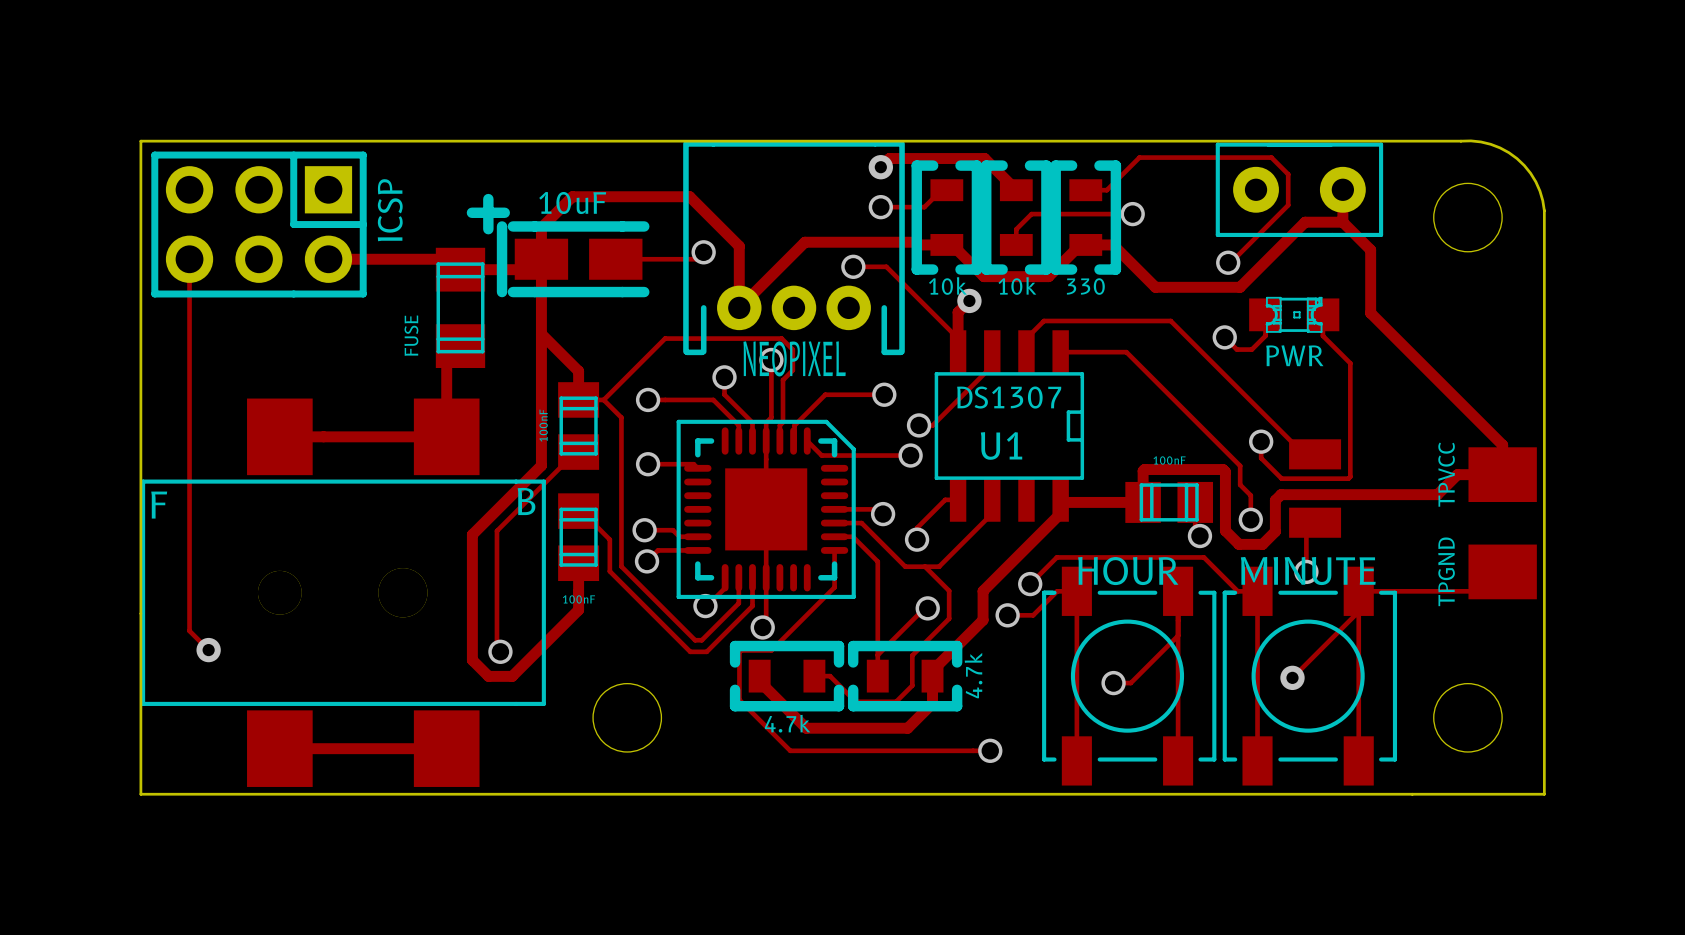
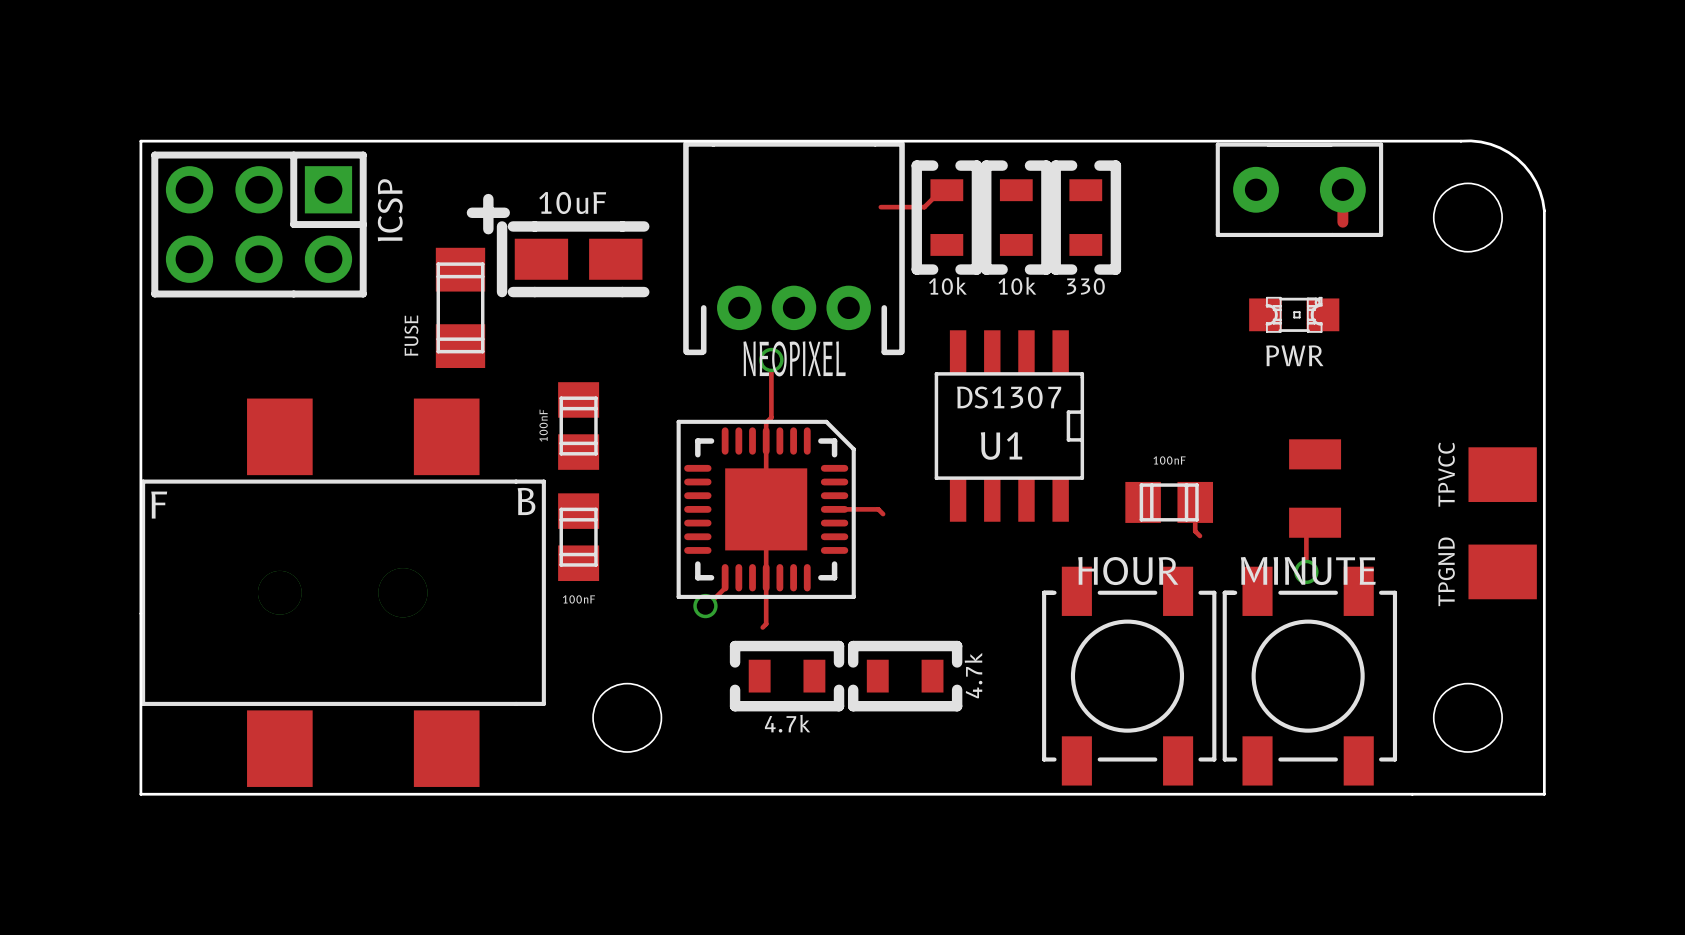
track: (880, 167) (889, 158) (984, 158) (1016, 190) -> none
via: (880, 167) -> none
track: (1085, 190) (1106, 190) (1139, 157) (1271, 157) (1288, 174) (1288, 205) (1230, 262) (1228, 262) -> none
via: (880, 207) -> none
track: (1132, 214) (1031, 214) (1016, 229) (1016, 244) -> none
via: (1132, 214) -> none
track: (703, 252) (696, 259) (615, 259) -> none
via: (703, 252) -> none
track: (189, 259) (189, 630) (208, 650) -> none
track: (328, 259) (450, 259) (460, 269) (531, 269) (541, 259) -> none
via: (1228, 262) -> none
track: (853, 266) (886, 266) (958, 338) (958, 352) (958, 312) (969, 300) -> none
via: (853, 266) -> none
via: (969, 300) -> none
track: (1265, 314) (1265, 335) (1251, 349) (1236, 349) (1224, 337) -> none
track: (1322, 314) (1322, 335) (1350, 363) (1350, 476) (1348, 478) (1281, 478) (1261, 458) (1261, 441) -> none
track: (541, 334) (578, 371) (578, 399) (603, 399) -> none
via: (1224, 337) -> none
track: (460, 346) (446, 359) (446, 436) (279, 436) -> none
track: (992, 352) (992, 365) (932, 425) (919, 425) -> none
track: (1026, 352) (1026, 338) (1043, 320) (1170, 320) (1304, 454) (1315, 454) -> none
track: (1060, 352) (1126, 352) (1240, 465) (1240, 484) (1250, 495) (1250, 519) -> none
track: (724, 377) (724, 394) (752, 422) (752, 441) -> none
via: (724, 377) -> none
track: (884, 394) (825, 394) (794, 425) (793, 441) -> none
via: (884, 394) -> none
track: (603, 399) (621, 417) (621, 566) (695, 640) (701, 640) (738, 603) (738, 577) -> none
track: (603, 399) (665, 338) (781, 338) (792, 349) (792, 370) (783, 380) (783, 422) (779, 425) (779, 441) -> none
track: (648, 399) (713, 399) (738, 425) (738, 441) -> none
via: (648, 399) -> none
via: (919, 425) -> none
track: (807, 441) (821, 455) (910, 455) -> none
via: (1261, 441) -> none
track: (578, 452) (575, 452) (496, 530) (496, 648) (500, 651) -> none
via: (910, 455) -> none
track: (648, 464) (693, 464) (697, 468) -> none
via: (648, 464) -> none
track: (958, 499) (945, 499) (917, 528) (917, 539) -> none
track: (992, 499) (992, 513) (939, 566) (905, 566) (861, 523) (834, 523) -> none
track: (578, 511) (581, 511) (609, 539) (609, 571) (690, 651) (706, 651) (752, 606) (752, 577) -> none
via: (883, 514) -> none
via: (1250, 519) -> none
track: (644, 530) (672, 530) (679, 536) (697, 536) -> none
via: (644, 530) -> none
track: (834, 536) (852, 536) (877, 561) (877, 676) -> none
via: (1199, 536) -> none
via: (917, 539) -> none
track: (697, 550) (657, 550) (647, 561) -> none
track: (834, 550) (834, 587) (771, 650) (741, 650) (739, 652) (739, 699) (790, 750) (990, 750) -> none
via: (647, 561) -> none
track: (578, 563) (578, 610) (512, 676) (488, 676) (472, 660) (472, 534) (541, 465) (541, 227) (572, 196) (689, 196) (739, 246) (739, 307) (804, 242) (916, 242) (919, 244) (952, 244) (983, 276) (1048, 276) (1080, 244) (1113, 244) (1155, 287) (1240, 287) (1305, 222) (1342, 222) (1370, 250) (1370, 313) (1502, 445) (1502, 474) (1457, 474) (1437, 494) (1281, 494) (1275, 500) (1275, 531) (1262, 544) (1239, 544) (1225, 530) (1225, 472) (1222, 469) (1144, 469) (1143, 502) (1063, 502) (1060, 499) (1060, 513) (983, 591) (983, 620) (932, 670) (932, 703) (907, 728) (806, 728) (759, 681) (759, 676) -> none
track: (925, 566) (949, 590) (949, 618) (912, 655) (912, 685) (896, 701) (855, 701) (830, 676) (814, 676) -> none
track: (1502, 571) (1483, 591) (1358, 591) (1358, 760) -> none
track: (1030, 584) (1056, 557) (1203, 557) (1237, 591) (1257, 591) (1257, 760) -> none
via: (1030, 584) -> none
track: (1178, 591) (1178, 760) -> none
track: (927, 608) (924, 608) (877, 655) -> none
via: (927, 608) -> none
track: (1358, 611) (1292, 677) -> none
track: (1007, 615) (1033, 615) (1057, 591) (1076, 591) (1076, 760) -> none
via: (1007, 615) -> none
via: (762, 627) -> none
track: (1178, 635) (1130, 683) (1113, 683) -> none
via: (208, 650) -> none
via: (500, 651) -> none
via: (1292, 677) -> none
via: (1113, 683) -> none
track: (279, 748) (446, 748) -> none
via: (990, 750) -> none

